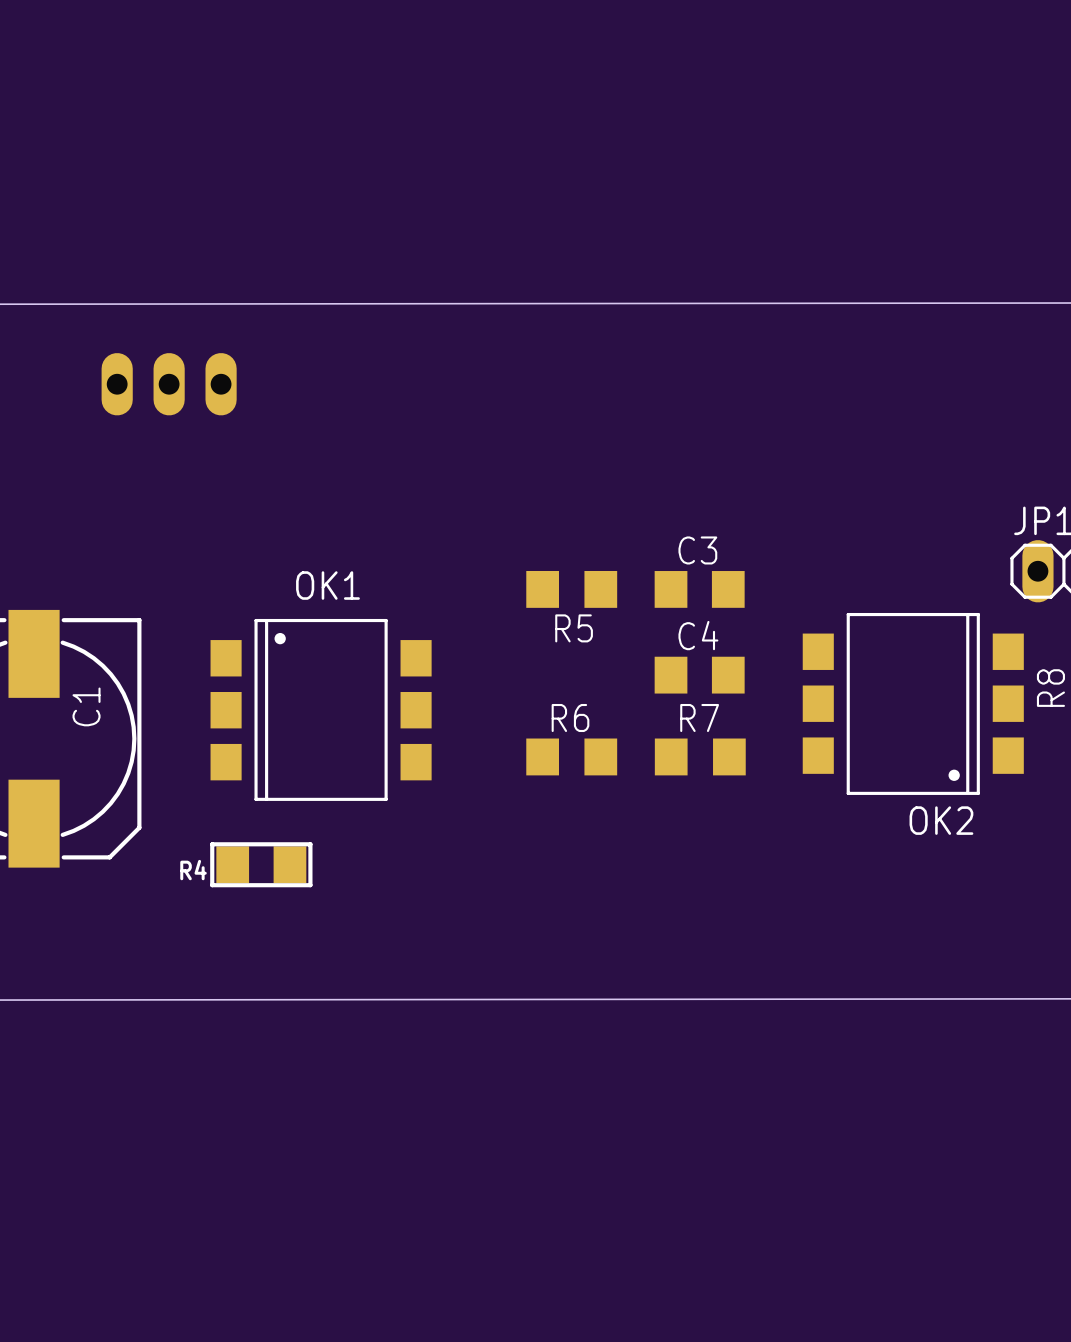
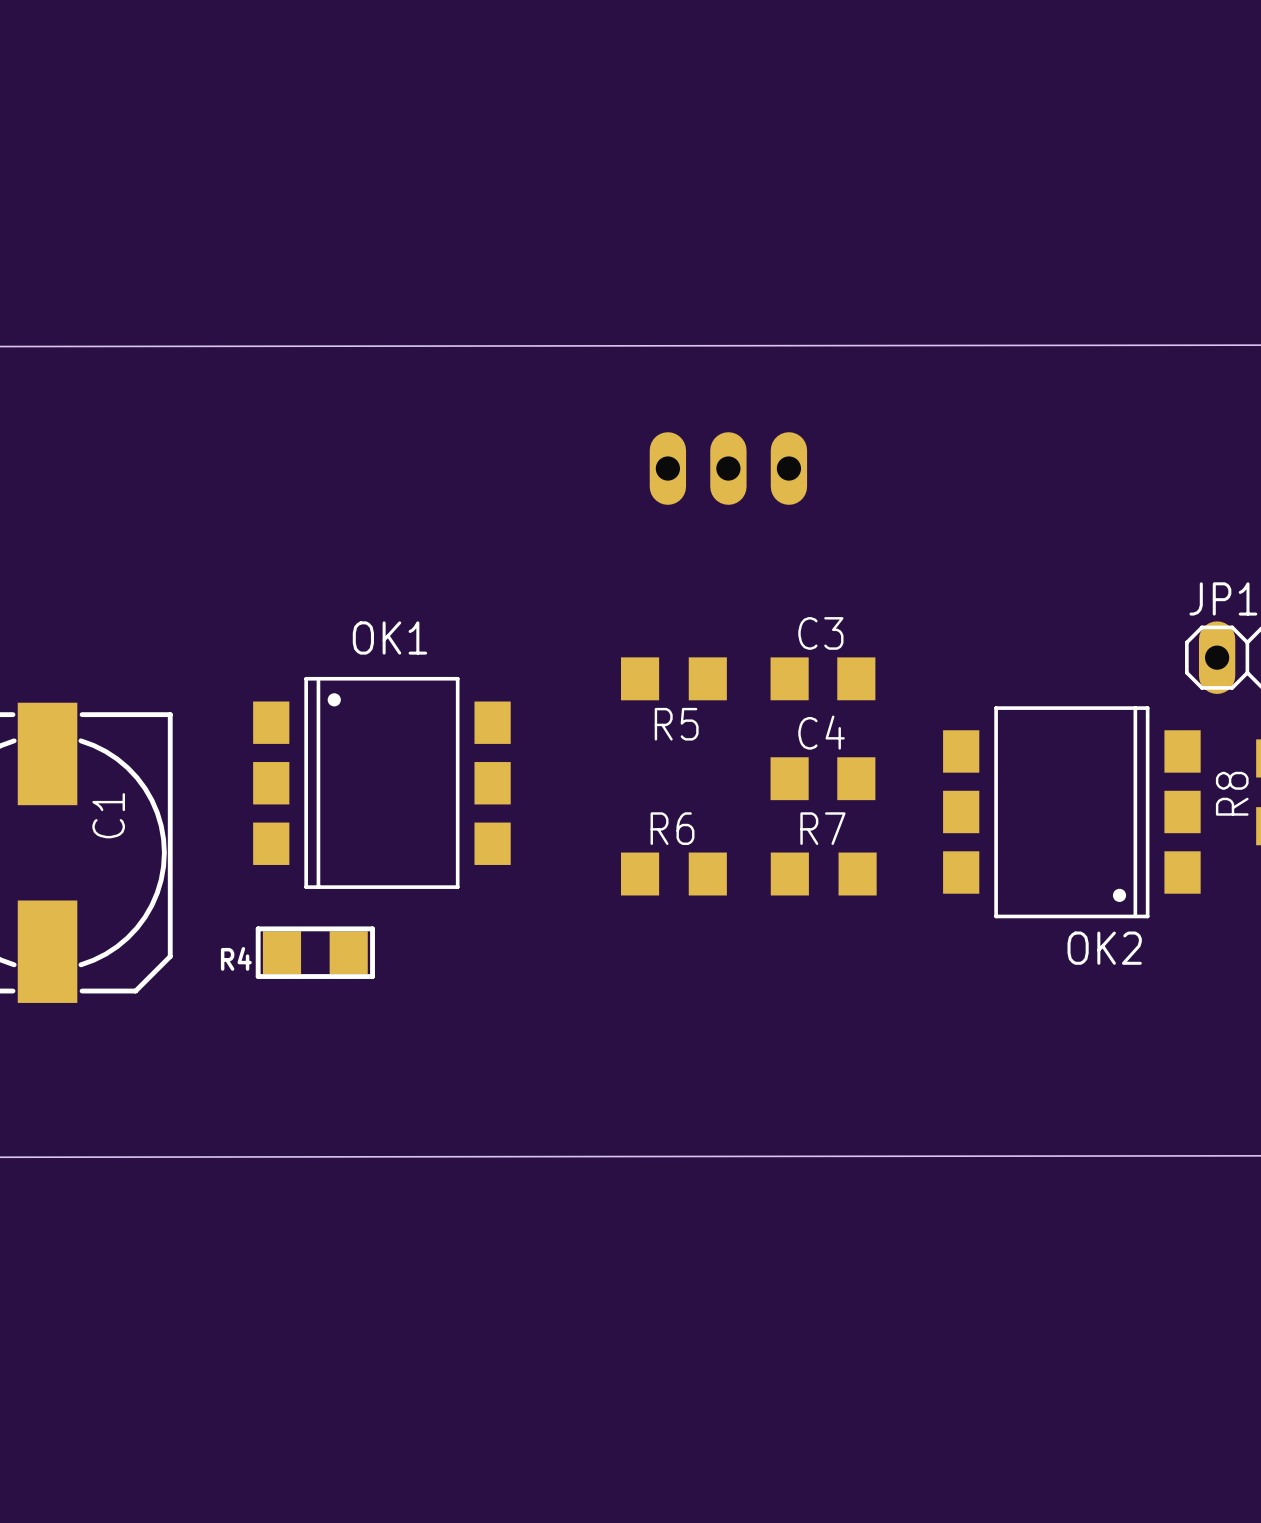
part position: (169, 384) -> (728, 468)
OK1 position: (321, 709) -> (381, 782)
R4 position: (261, 864) -> (315, 952)

